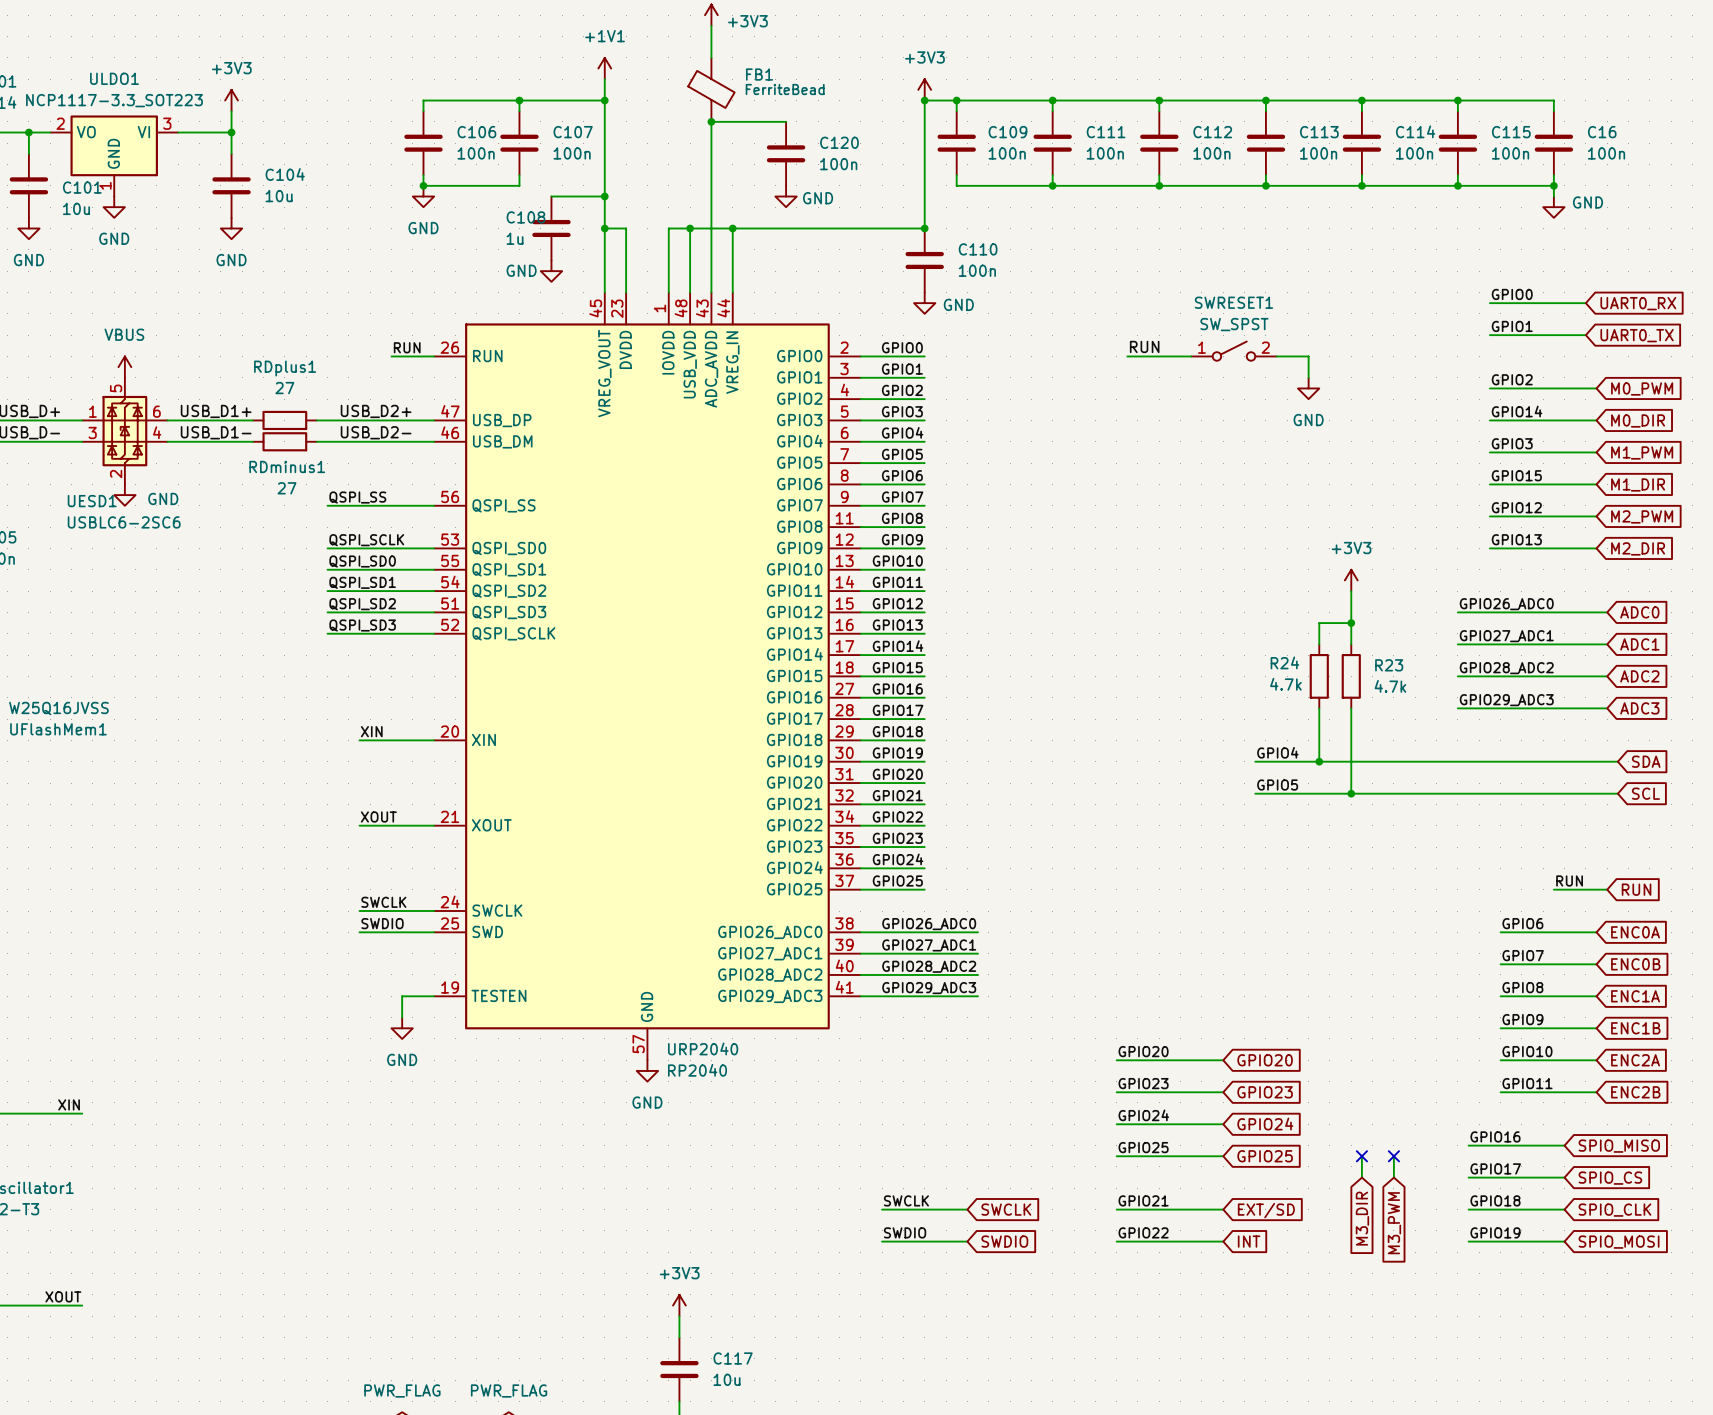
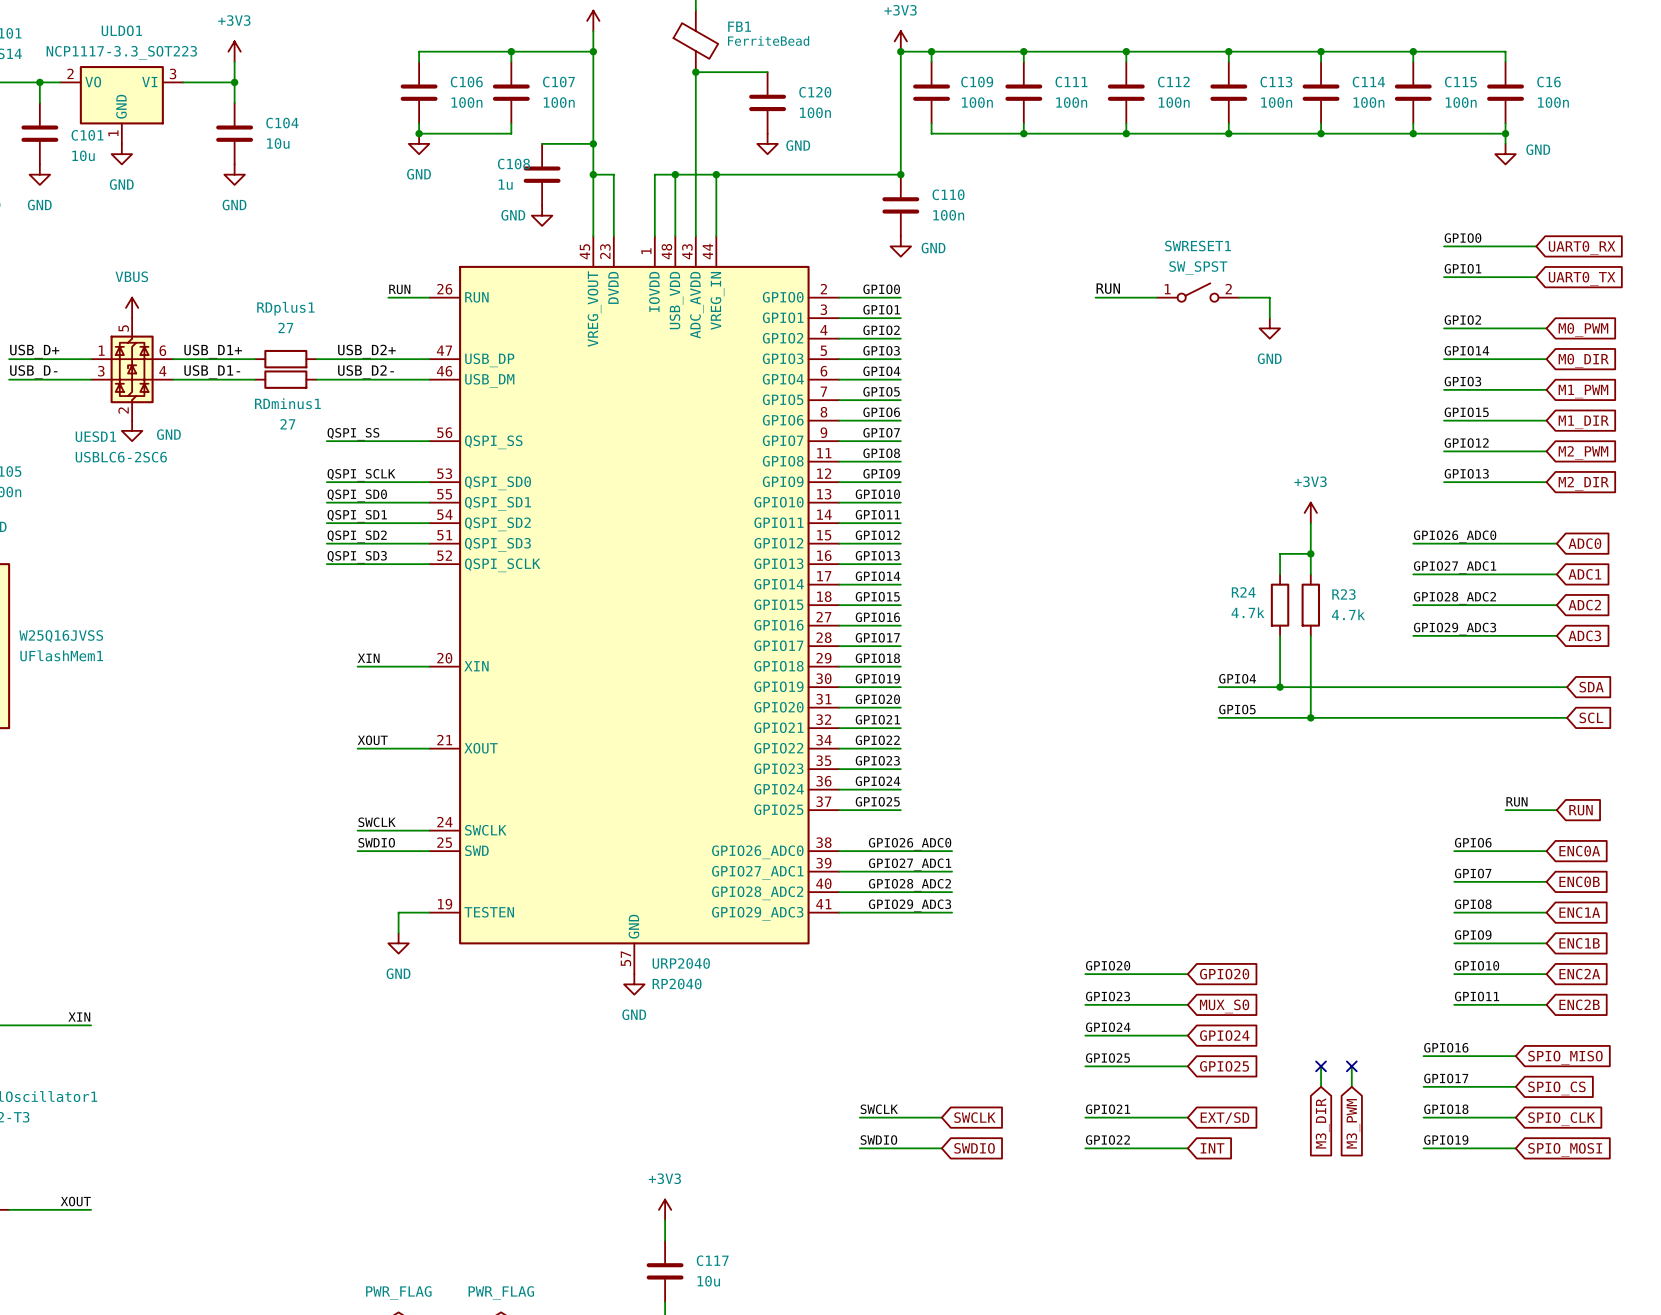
global label: GPIO23 (1265, 1092) -> MUX_S0 (1224, 1006)

